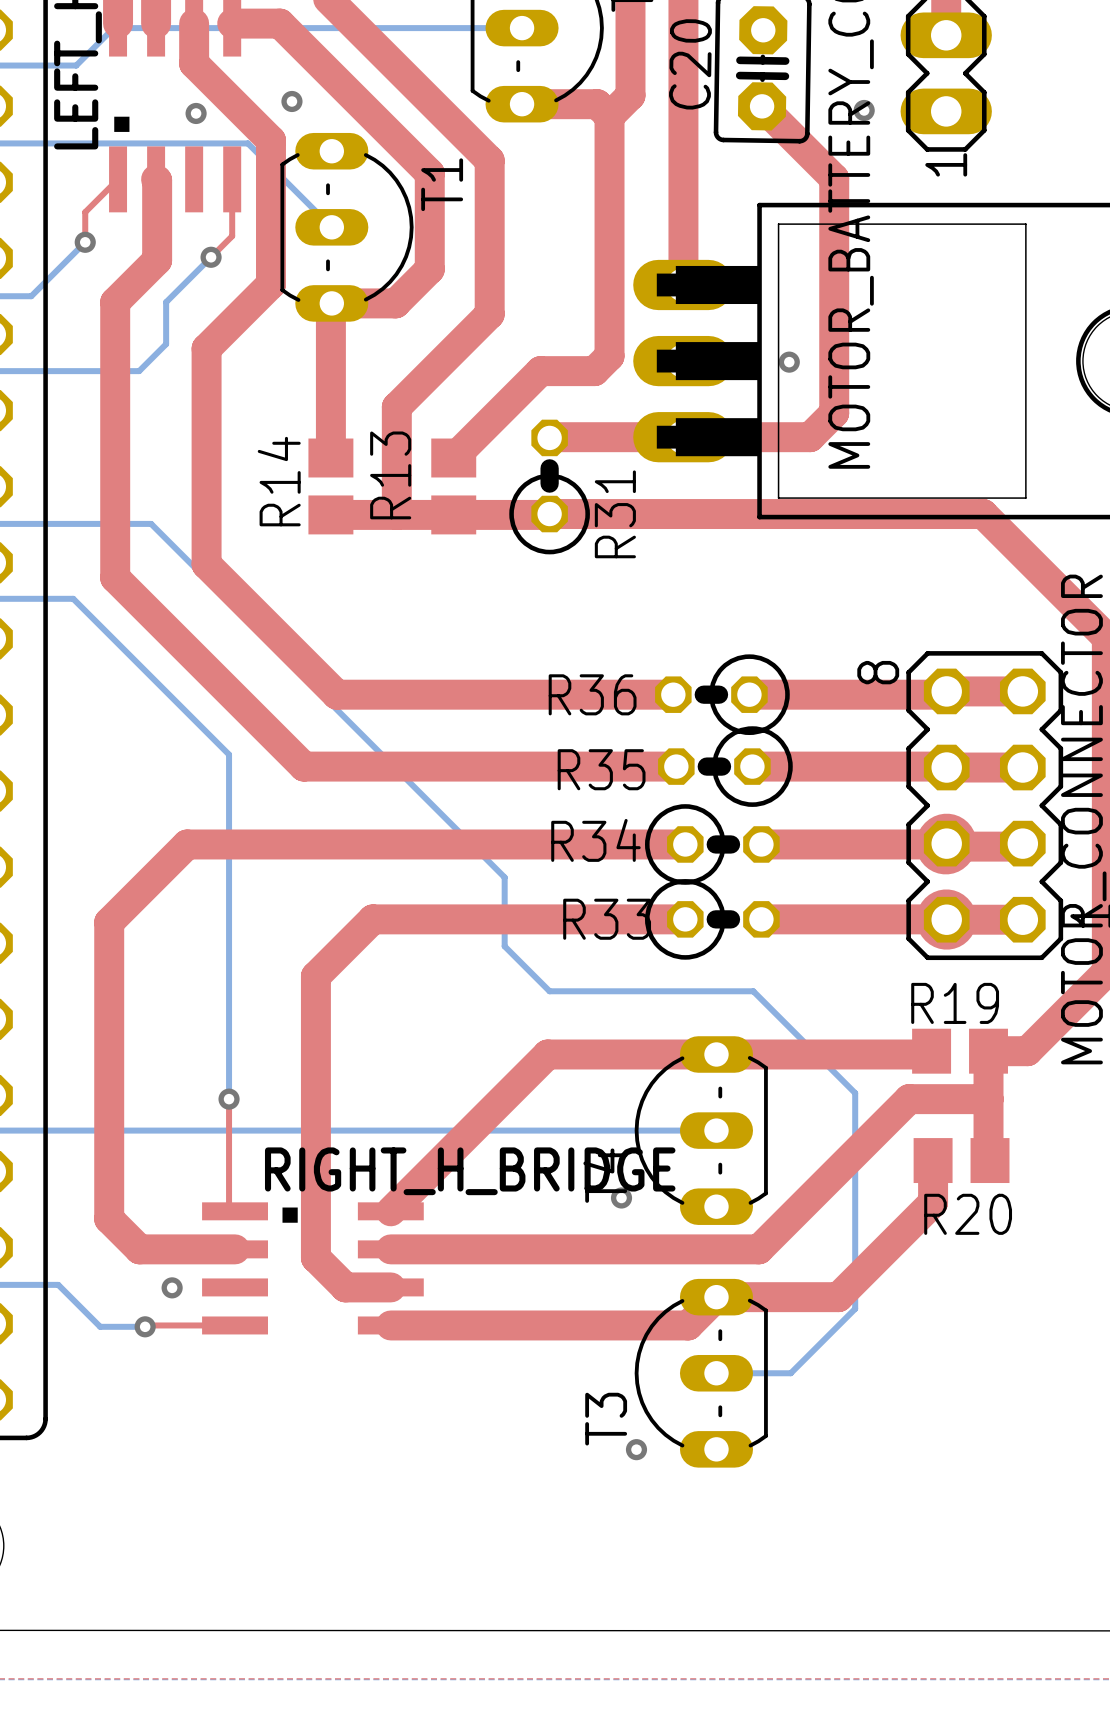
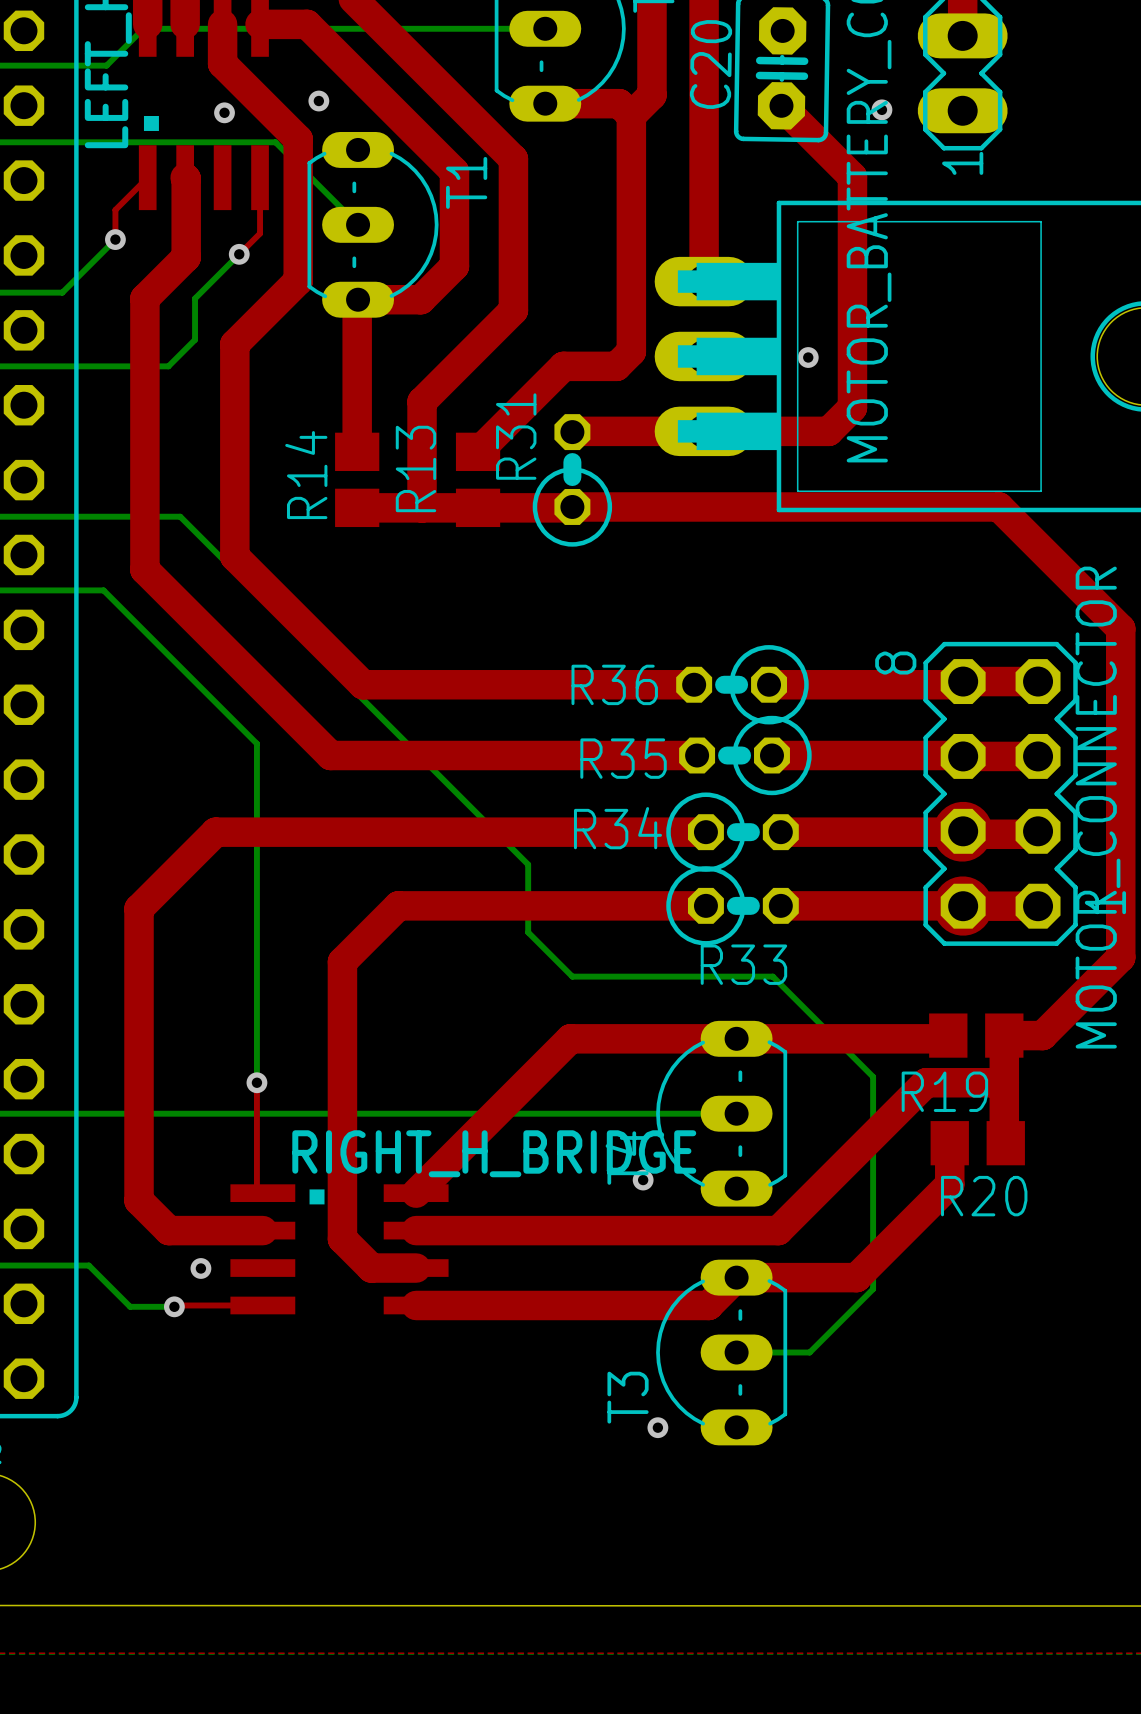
R31 name position: R31 (615, 514) -> R31 (516, 436)
R33 name position: R33 (607, 919) -> R33 (743, 964)
R19 name position: R19 (955, 1003) -> R19 (944, 1091)

